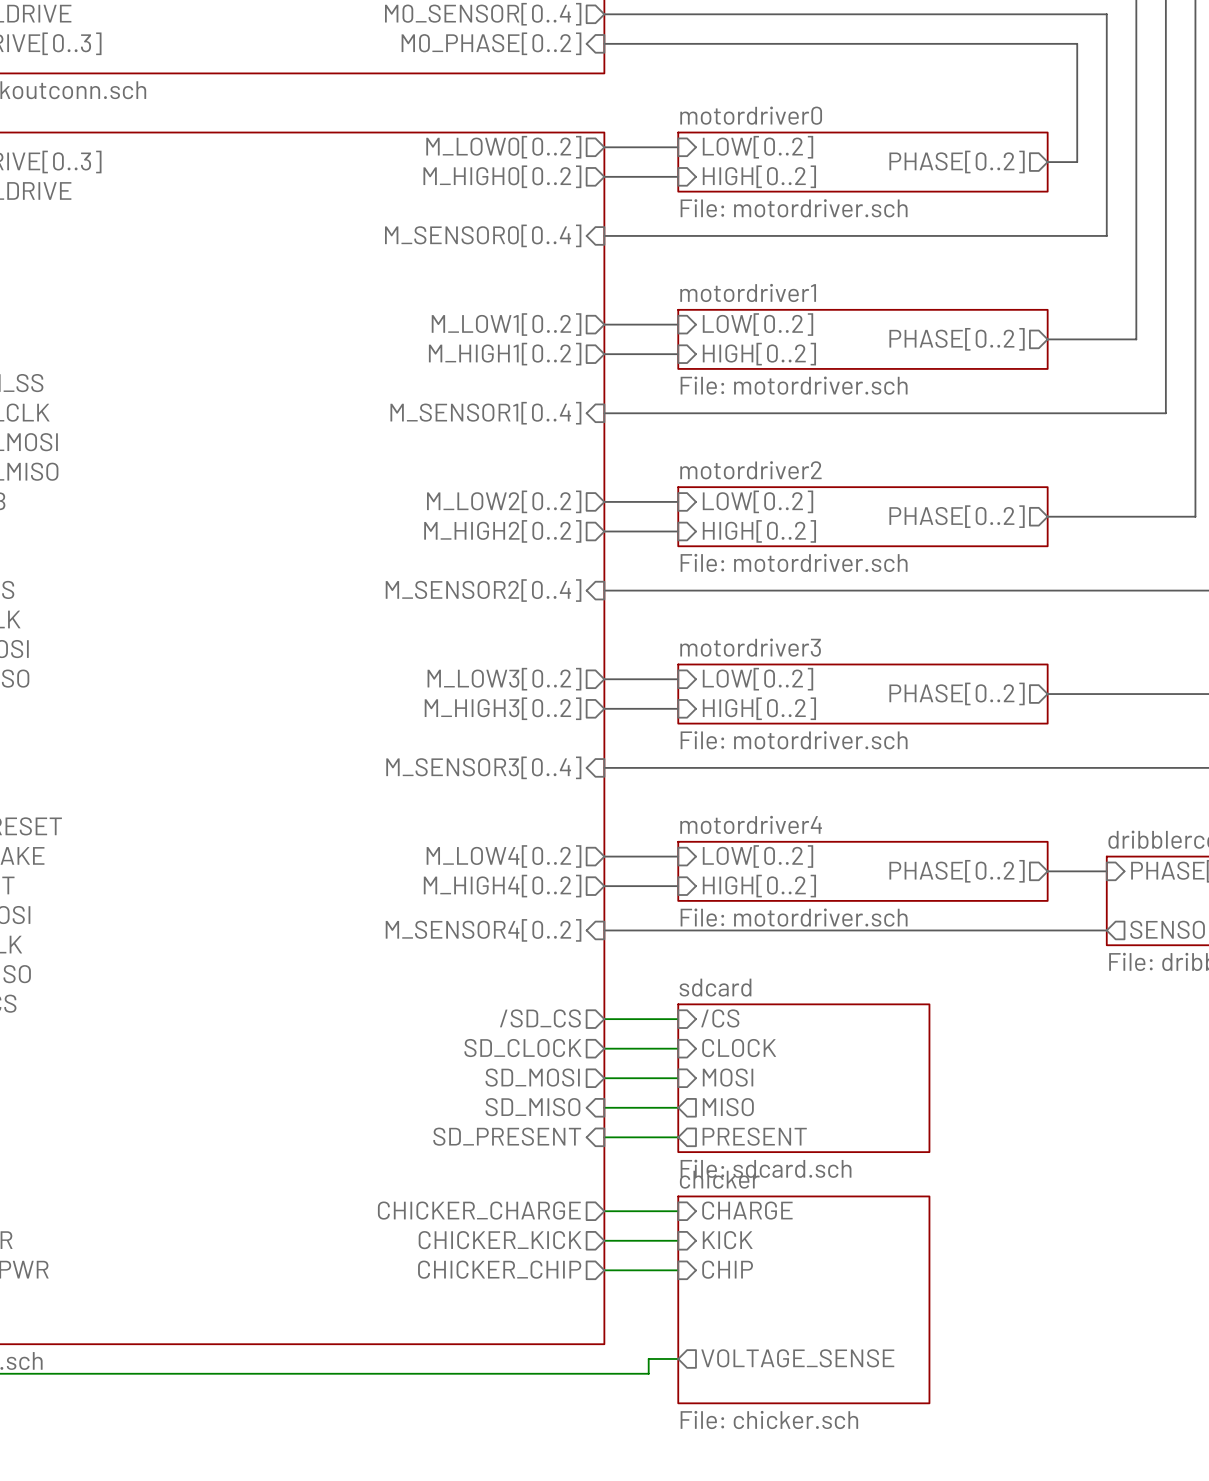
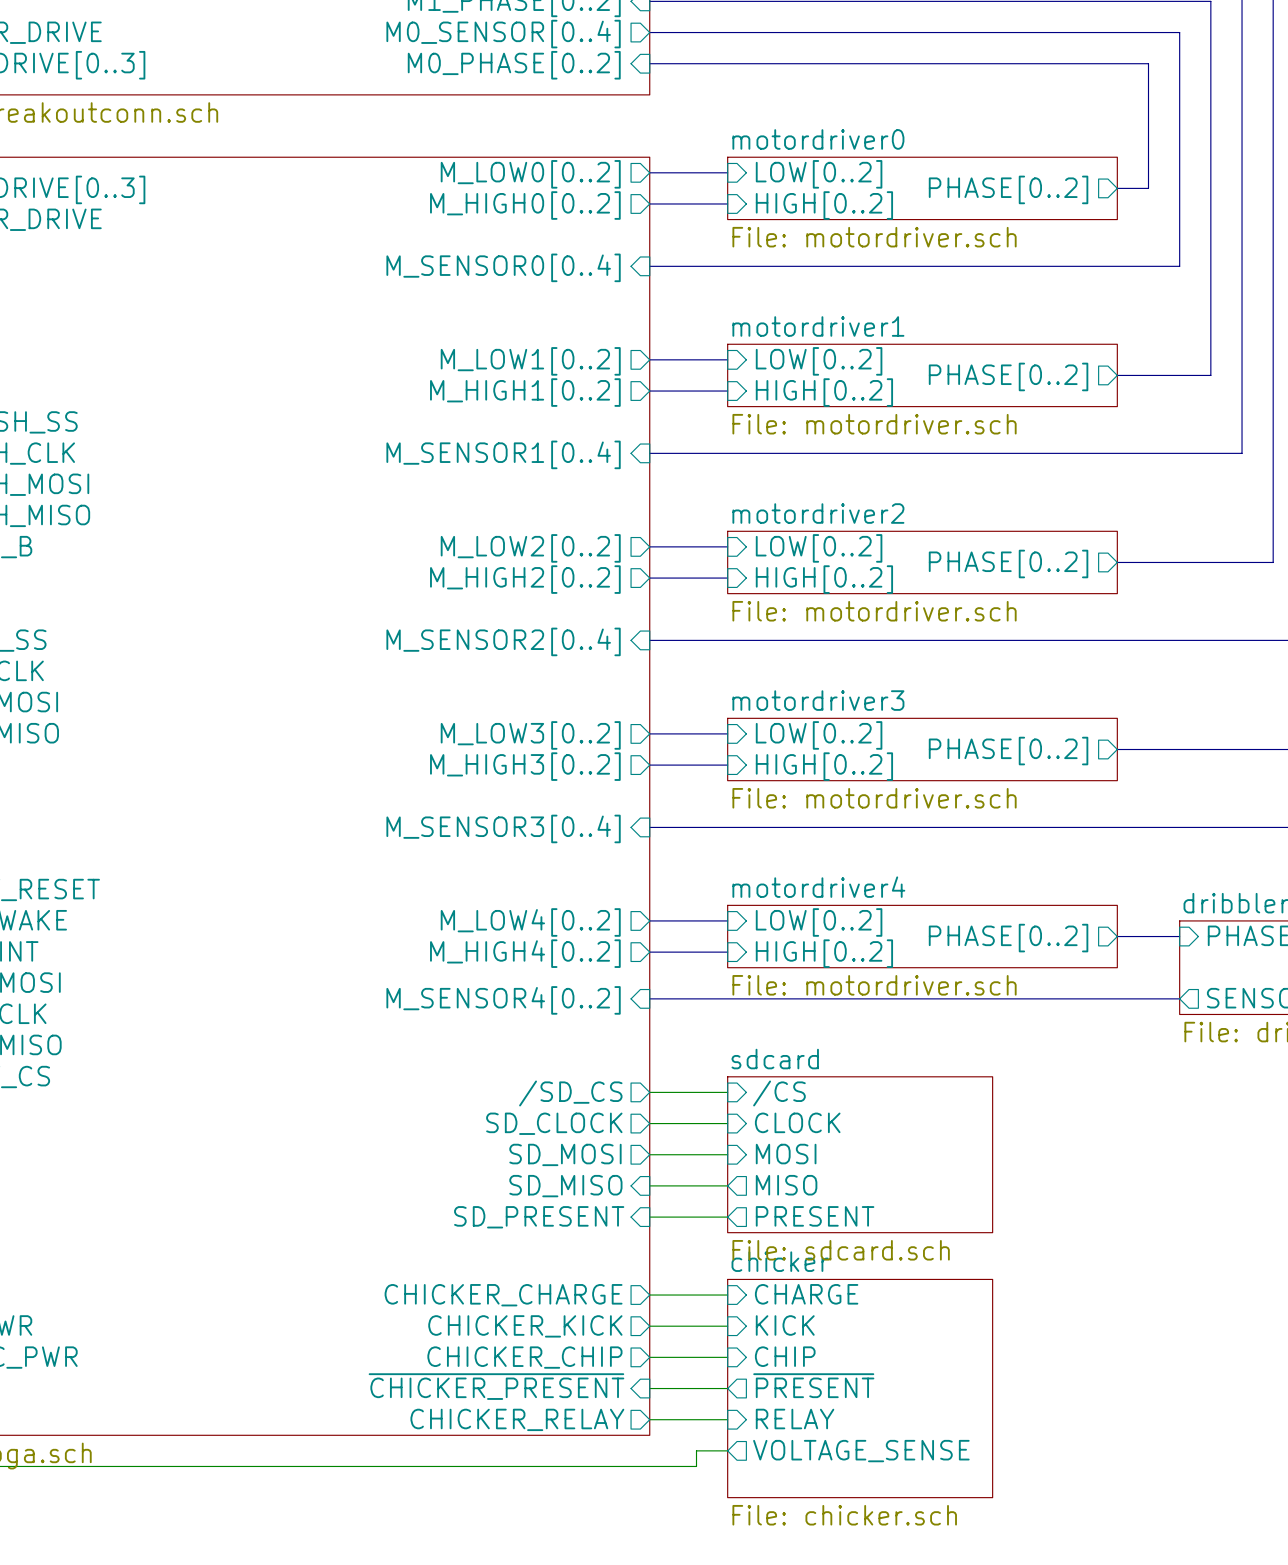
sheet pin: none -> ~{CHICKER_PRESENT} (496, 1386)
sheet pin: none -> ~{PRESENT} (813, 1385)
wire: none -> (649, 1388) (727, 1388)
sheet pin: none -> CHICKER_RELAY (517, 1419)
sheet pin: none -> RELAY (795, 1419)
wire: none -> (649, 1419) (727, 1419)

